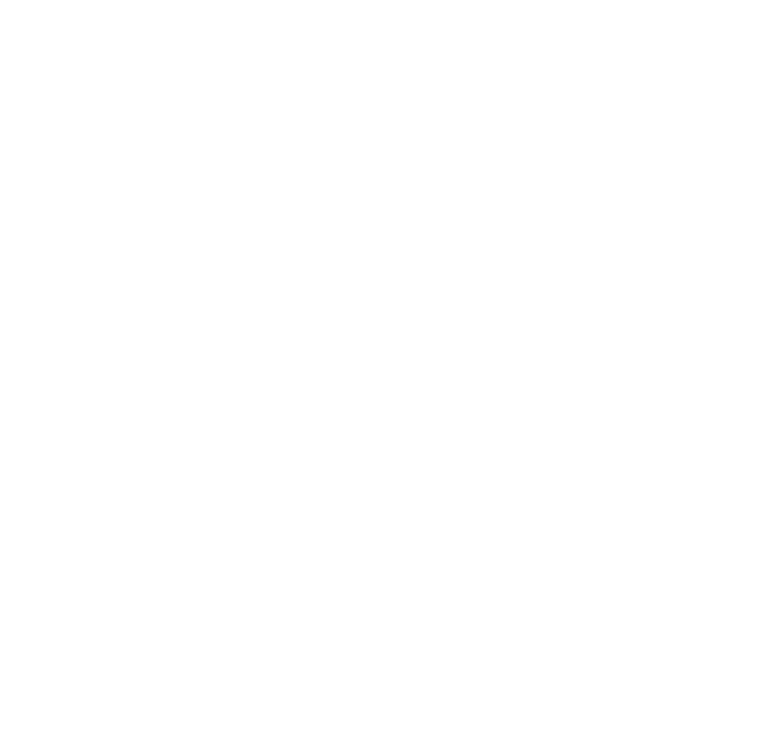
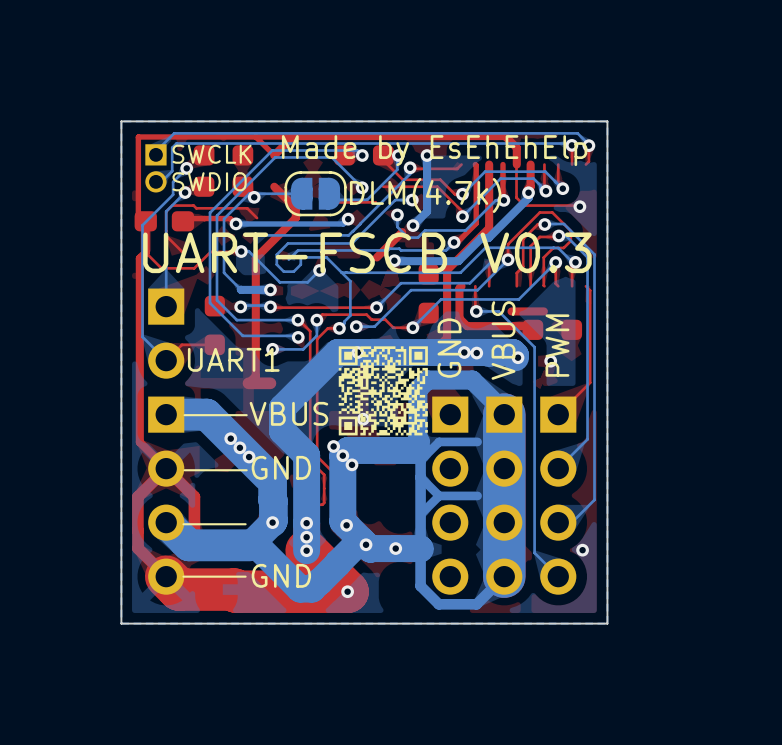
board edge: none -> (607, 121) (121, 121) (121, 623) (607, 623) (607, 121)
top track: none -> (255, 136) (274, 155) (293, 136) (505, 136) (516, 147) (516, 164)
top track: none -> (292, 136) (138, 136)
top track: none -> (138, 137) (138, 213) (145, 221) (145, 252)
bottom track: none -> (571, 145) (570, 143) (176, 143) (172, 147) (172, 171) (161, 181) (155, 181)
via: none -> (571, 145)
top track: none -> (572, 145) (572, 164)
top track: none -> (588, 145) (588, 161) (585, 164)
bottom track: none -> (588, 145) (577, 133) (174, 133) (155, 151) (155, 154)
via: none -> (588, 145)
text: none -> Made by EsEhEhElp (434, 150)
text: none -> SWCLK (212, 154)
part: none -> (223, 155)
bottom track: none -> (362, 155) (357, 150) (272, 150) (210, 212) (210, 303) (242, 335) (298, 337)
via: none -> (362, 155)
part: none -> (363, 155)
top track: none -> (398, 155) (383, 155) (383, 160) (402, 179) (440, 179) (454, 194) (462, 194)
bottom track: none -> (398, 155) (397, 169) (367, 199) (335, 199) (329, 193)
via: none -> (398, 155)
bottom track: none -> (427, 155) (427, 211) (413, 225)
via: none -> (427, 155)
top track: none -> (461, 164) (457, 168) (410, 167)
top track: none -> (475, 164) (476, 223) (457, 242) (454, 242)
top track: none -> (489, 164) (489, 228) (447, 270) (447, 337) (431, 353)
top track: none -> (502, 164) (503, 200)
top track: none -> (516, 164) (516, 197) (524, 205) (579, 206)
top track: none -> (530, 164) (530, 186) (528, 192)
top track: none -> (544, 164) (545, 190)
top track: none -> (558, 164) (558, 184) (562, 188)
bottom track: none -> (410, 167) (410, 173) (360, 223)
via: none -> (410, 167)
part: none -> (155, 168)
bottom track: none -> (186, 168) (173, 181) (173, 194) (142, 225) (142, 336) (166, 360)
via: none -> (186, 168)
text: none -> SWDIO (209, 181)
part: none -> (223, 186)
top track: none -> (274, 186) (295, 208) (295, 218) (255, 258) (255, 376) (248, 383) (270, 383)
top track: none -> (383, 186) (437, 186) (462, 211) (462, 216)
bottom track: none -> (362, 187) (331, 157) (275, 157) (216, 215) (216, 300) (236, 320) (297, 320)
via: none -> (362, 187)
bottom track: none -> (562, 188) (545, 171) (485, 171) (462, 194)
via: none -> (562, 188)
bottom track: none -> (545, 191) (540, 189) (540, 185) (533, 178) (500, 178) (462, 216)
via: none -> (545, 191)
bottom track: none -> (185, 192) (166, 211) (166, 306)
via: none -> (185, 192)
bottom track: none -> (528, 192) (528, 197) (488, 238) (481, 238) (458, 261) (394, 260)
via: none -> (528, 192)
bottom track: none -> (301, 193) (249, 193) (224, 218) (224, 272) (241, 289) (270, 289)
part: none -> (315, 193)
via: none -> (462, 194)
text: none -> DLM(4.7k) (425, 195)
via: none -> (254, 197)
bottom track: none -> (412, 200) (395, 200) (351, 243) (287, 243) (276, 254) (276, 264) (283, 271) (293, 271) (300, 264) (300, 257)
via: none -> (412, 200)
bottom track: none -> (503, 200) (495, 200) (465, 230) (425, 230) (417, 237) (408, 237) (397, 226) (397, 214)
via: none -> (503, 200)
top track: none -> (375, 202) (334, 202)
via: none -> (579, 206)
via: none -> (397, 214)
via: none -> (462, 216)
top track: none -> (257, 218) (247, 208) (196, 208) (193, 205) (172, 205) (166, 211) (166, 235) (182, 252)
bottom track: none -> (348, 219) (343, 223) (236, 223)
via: none -> (348, 219)
part: none -> (164, 221)
top track: none -> (182, 221) (185, 218) (230, 218) (236, 223)
via: none -> (236, 223)
bottom track: none -> (360, 224) (353, 231)
top track: none -> (544, 224) (537, 224) (523, 239) (523, 266) (516, 273) (516, 286)
bottom track: none -> (544, 224) (563, 223) (594, 254) (594, 499) (571, 522) (558, 522)
via: none -> (544, 224)
via: none -> (413, 225)
bottom track: none -> (352, 231) (348, 235) (257, 235) (254, 238)
top track: none -> (402, 232) (376, 257)
top track: none -> (558, 235) (539, 236) (530, 246) (530, 286)
bottom track: none -> (558, 235) (566, 235) (587, 257) (587, 439) (558, 468)
via: none -> (558, 235)
bottom track: none -> (454, 242) (446, 250) (401, 250) (399, 248) (387, 250) (297, 250) (288, 259)
via: none -> (454, 242)
bottom track: none -> (553, 247) (485, 247) (460, 272) (346, 272)
bottom track: none -> (553, 247) (558, 247) (570, 262) (575, 262)
top track: none -> (241, 251) (210, 251) (194, 268) (161, 268) (145, 252)
bottom track: none -> (241, 251) (249, 251) (279, 282) (307, 282) (319, 270)
via: none -> (241, 251)
top track: none -> (145, 252) (139, 258) (139, 442) (166, 468)
text: none -> UART-FSCB V0.3 (367, 252)
bottom track: none -> (300, 257) (326, 257) (350, 281) (350, 315) (339, 328)
top track: none -> (490, 259) (489, 286)
bottom track: none -> (490, 259) (490, 262) (469, 283) (401, 283) (376, 307)
top track: none -> (508, 259) (508, 244) (539, 212) (552, 212) (570, 231) (570, 240) (563, 247) (553, 247) (543, 257) (544, 286)
bottom track: none -> (508, 259) (477, 290) (411, 290) (374, 326) (356, 326)
via: none -> (508, 259)
via: none -> (394, 260)
top track: none -> (555, 262) (555, 283) (558, 286)
bottom track: none -> (555, 262) (518, 299) (441, 299) (412, 327)
via: none -> (555, 262)
top track: none -> (575, 262) (572, 265) (572, 286)
via: none -> (575, 262)
via: none -> (319, 270)
bottom track: none -> (346, 272) (341, 272)
top track: none -> (461, 286) (459, 288) (459, 318) (467, 326) (529, 326) (532, 329)
top track: none -> (475, 286) (476, 311)
top track: none -> (585, 286) (590, 290) (590, 382) (558, 414)
via: none -> (270, 289)
part: none -> (428, 293)
via: none -> (240, 306)
top track: none -> (270, 306) (376, 307)
bottom track: none -> (270, 306) (240, 306)
via: none -> (270, 306)
via: none -> (376, 307)
bottom track: none -> (476, 311) (498, 311) (534, 347) (534, 552) (558, 576)
via: none -> (476, 311)
top track: none -> (543, 311) (511, 311)
top track: none -> (428, 313) (412, 327) (393, 327) (385, 319) (371, 319) (366, 314) (322, 314) (316, 320)
top track: none -> (297, 320) (310, 331) (310, 460) (324, 474) (324, 502) (322, 504) (304, 504) (302, 502) (302, 488)
via: none -> (297, 320)
bottom track: none -> (316, 320) (316, 335) (303, 349) (272, 349)
via: none -> (316, 320)
part: none -> (214, 325)
via: none -> (356, 326)
via: none -> (412, 327)
top track: none -> (339, 328) (327, 328) (317, 339) (317, 456) (334, 474) (334, 488)
via: none -> (339, 328)
part: none -> (552, 329)
part: none -> (166, 333)
via: none -> (298, 337)
text: none -> VBUS (503, 340)
top track: none -> (214, 344) (181, 344) (166, 360)
text: none -> PWM (557, 345)
drawing: none -> [338, 346, 428, 436]
text: none -> GND (449, 348)
via: none -> (272, 349)
via: none -> (357, 352)
via: none -> (464, 352)
via: none -> (476, 353)
bottom track: none -> (515, 357) (512, 352) (337, 352) (282, 407) (282, 431) (306, 455) (306, 550)
via: none -> (517, 357)
text: none -> UART1 (233, 359)
via: none -> (550, 361)
bottom track: none -> (472, 380) (427, 380) (417, 389) (417, 438) (420, 441) (420, 586) (438, 604) (476, 604) (504, 576) (504, 411) (472, 380)
text: none -> VBUS (288, 413)
bottom track: none -> (166, 414) (206, 414) (267, 475)
line: none -> (246, 415) (184, 415)
via: none -> (363, 419)
via: none -> (230, 438)
bottom track: none -> (477, 441) (439, 441) (420, 460)
via: none -> (333, 446)
via: none -> (239, 447)
bottom track: none -> (417, 450) (348, 450) (342, 455) (342, 521) (370, 549) (420, 549)
via: none -> (342, 455)
via: none -> (249, 457)
via: none -> (351, 464)
text: none -> GND (281, 467)
top track: none -> (166, 468) (137, 496) (137, 530)
top track: none -> (166, 468) (194, 496) (194, 548)
line: none -> (246, 470) (184, 470)
bottom track: none -> (272, 475) (273, 520) (254, 540) (254, 543) (300, 589) (312, 589) (362, 540)
bottom track: none -> (420, 477) (439, 495)
part: none -> (166, 495)
bottom track: none -> (439, 495) (420, 514)
part: none -> (450, 495)
bottom track: none -> (477, 495) (439, 495)
part: none -> (504, 495)
part: none -> (558, 495)
bottom track: none -> (166, 522) (188, 545) (249, 545)
via: none -> (272, 522)
top track: none -> (306, 523) (306, 550) (347, 591) (179, 589) (138, 548) (138, 530)
via: none -> (306, 523)
line: none -> (245, 524) (183, 524)
via: none -> (346, 525)
via: none -> (306, 537)
via: none -> (366, 544)
via: none -> (395, 548)
via: none -> (306, 550)
via: none -> (582, 550)
text: none -> GND (281, 575)
line: none -> (245, 576) (183, 576)
via: none -> (347, 591)

